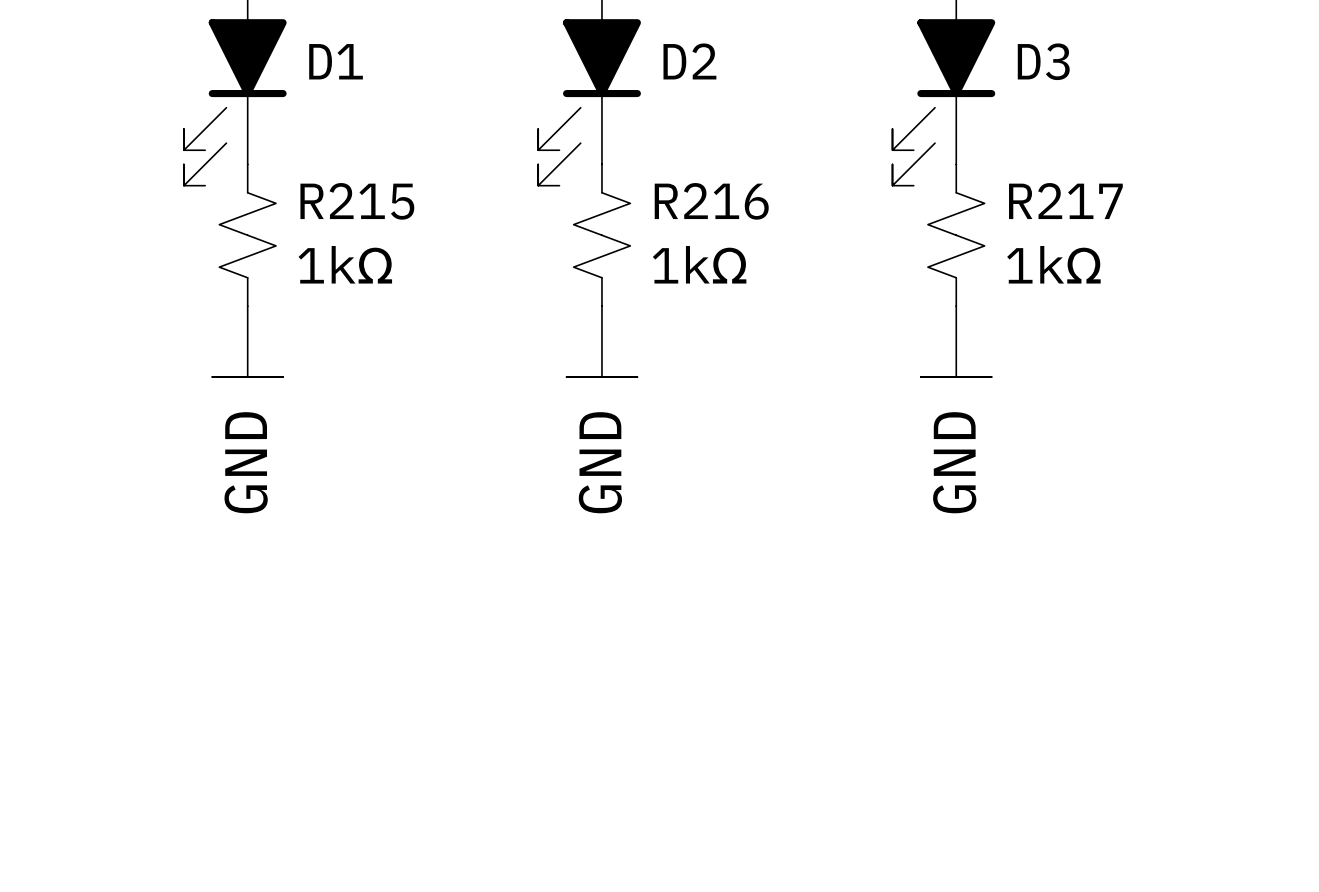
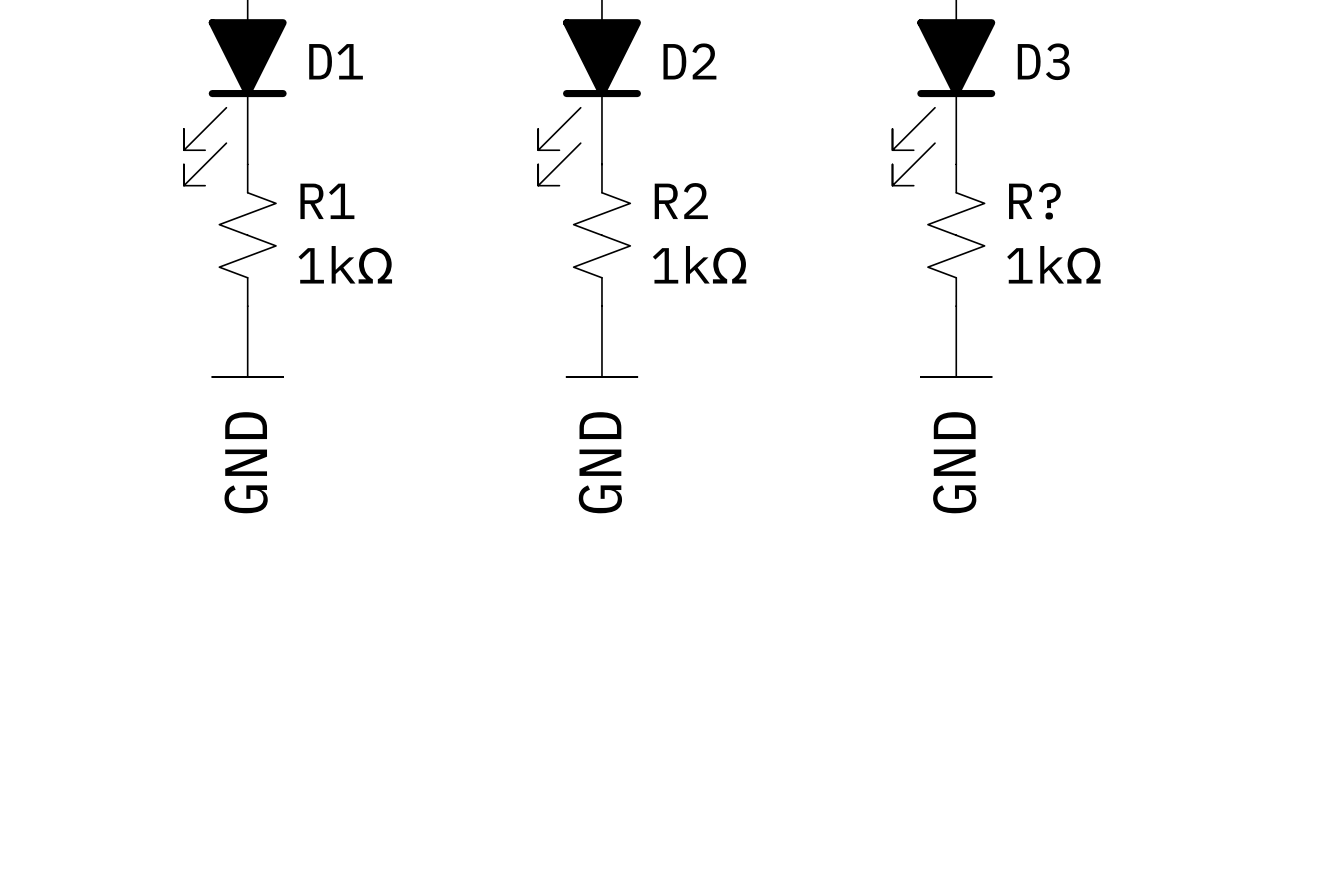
R215 name: R215 (357, 201) -> R1 (327, 201)
R216 name: R216 (711, 201) -> R2 (681, 201)
R217 name: R217 (1065, 201) -> R? (1034, 201)

